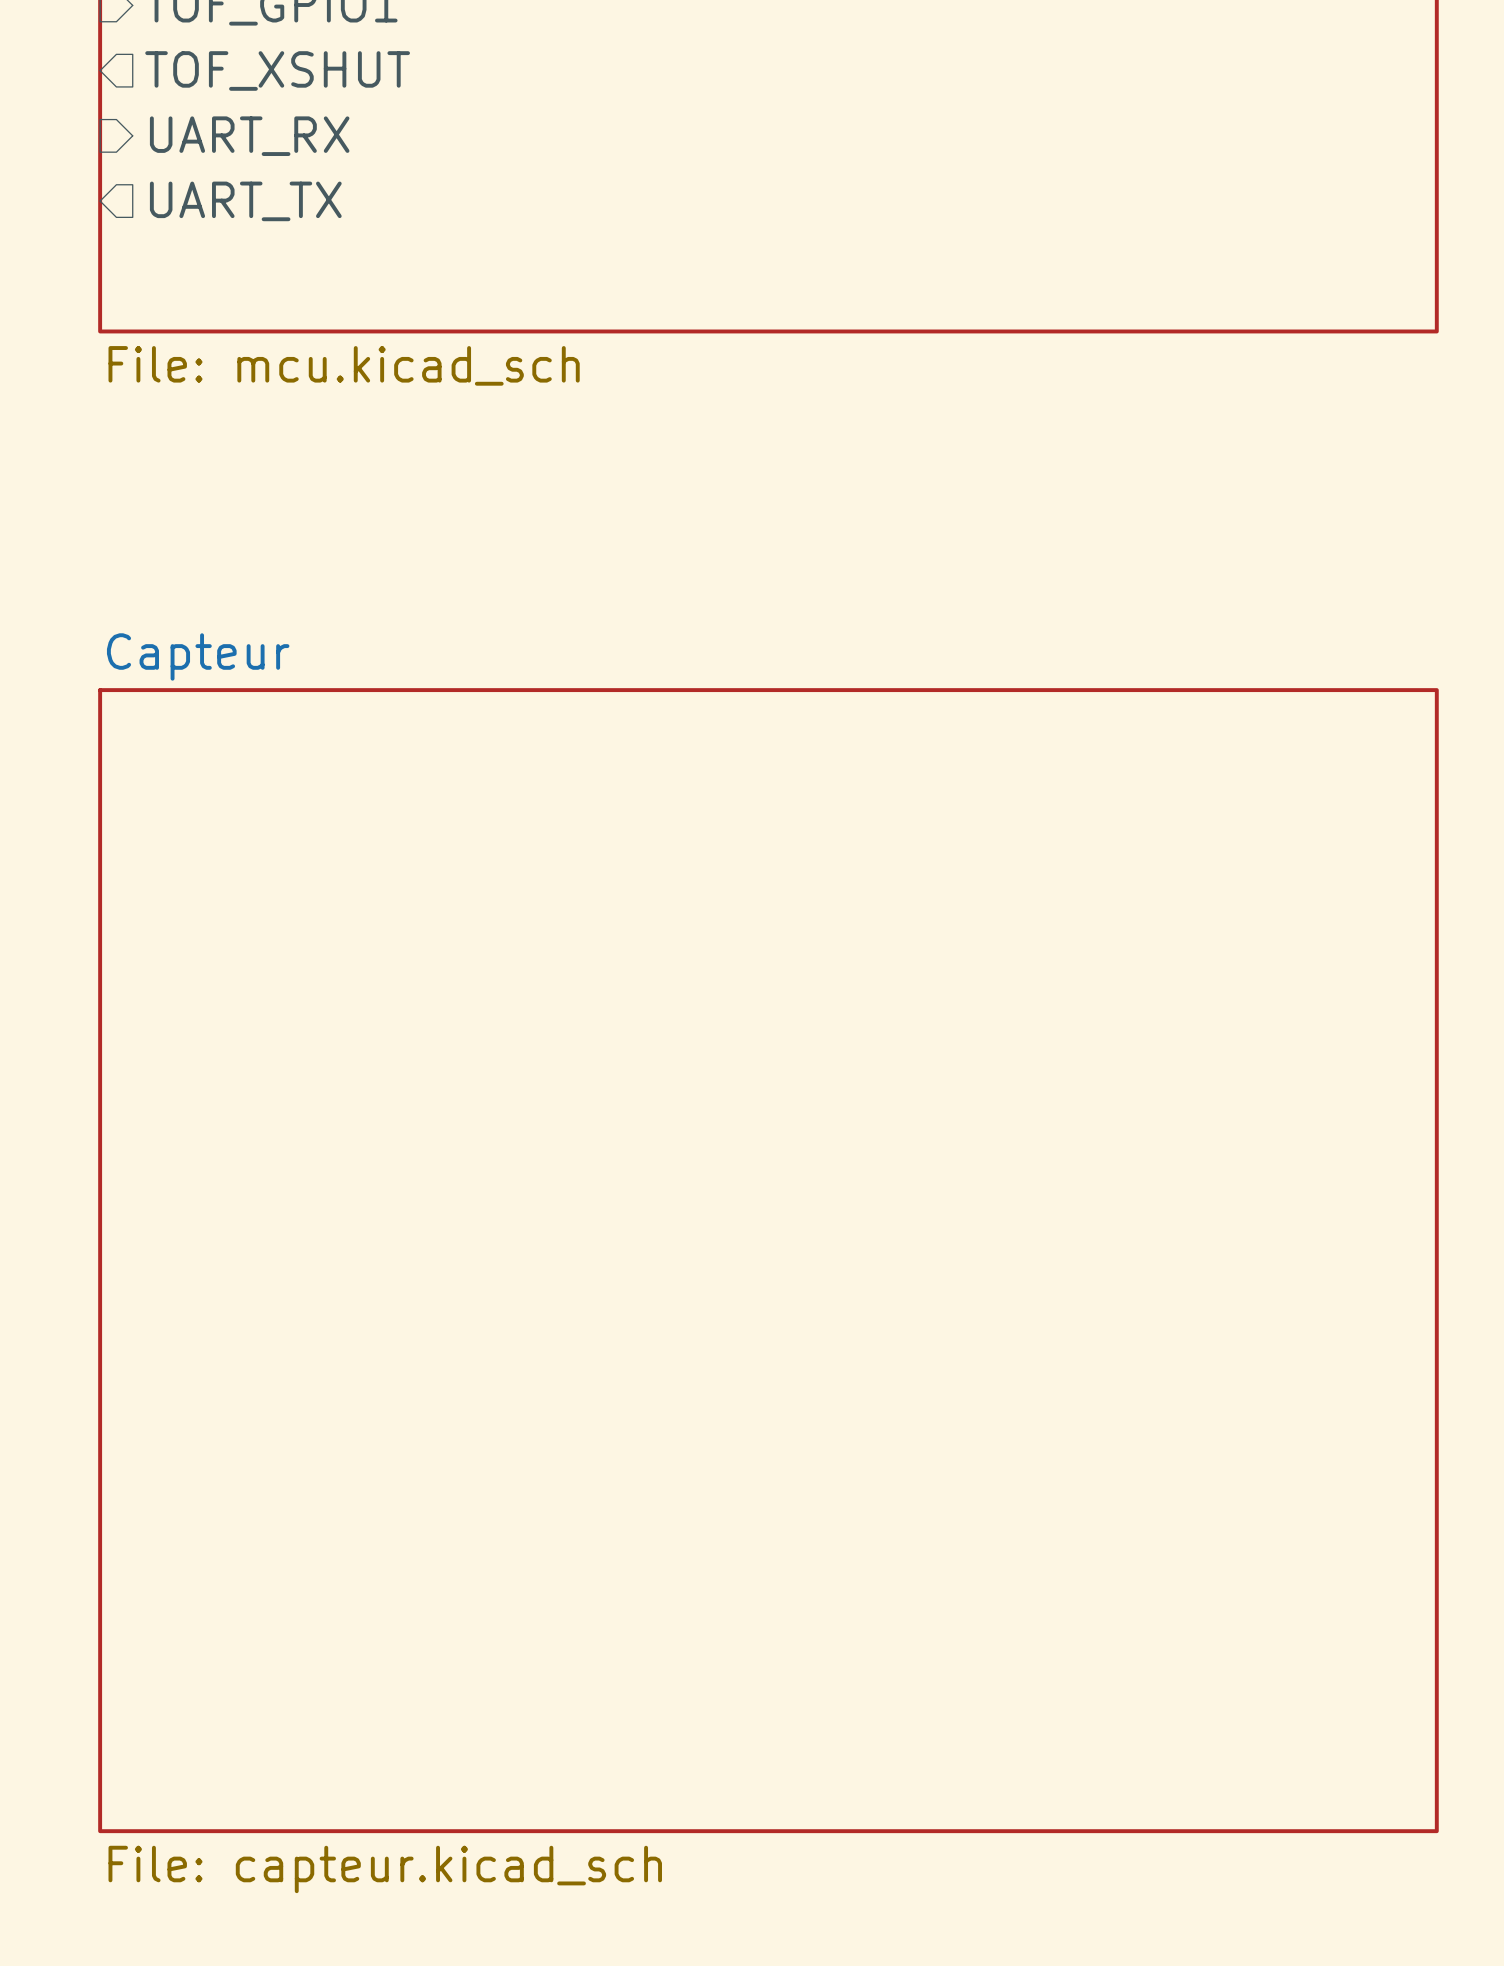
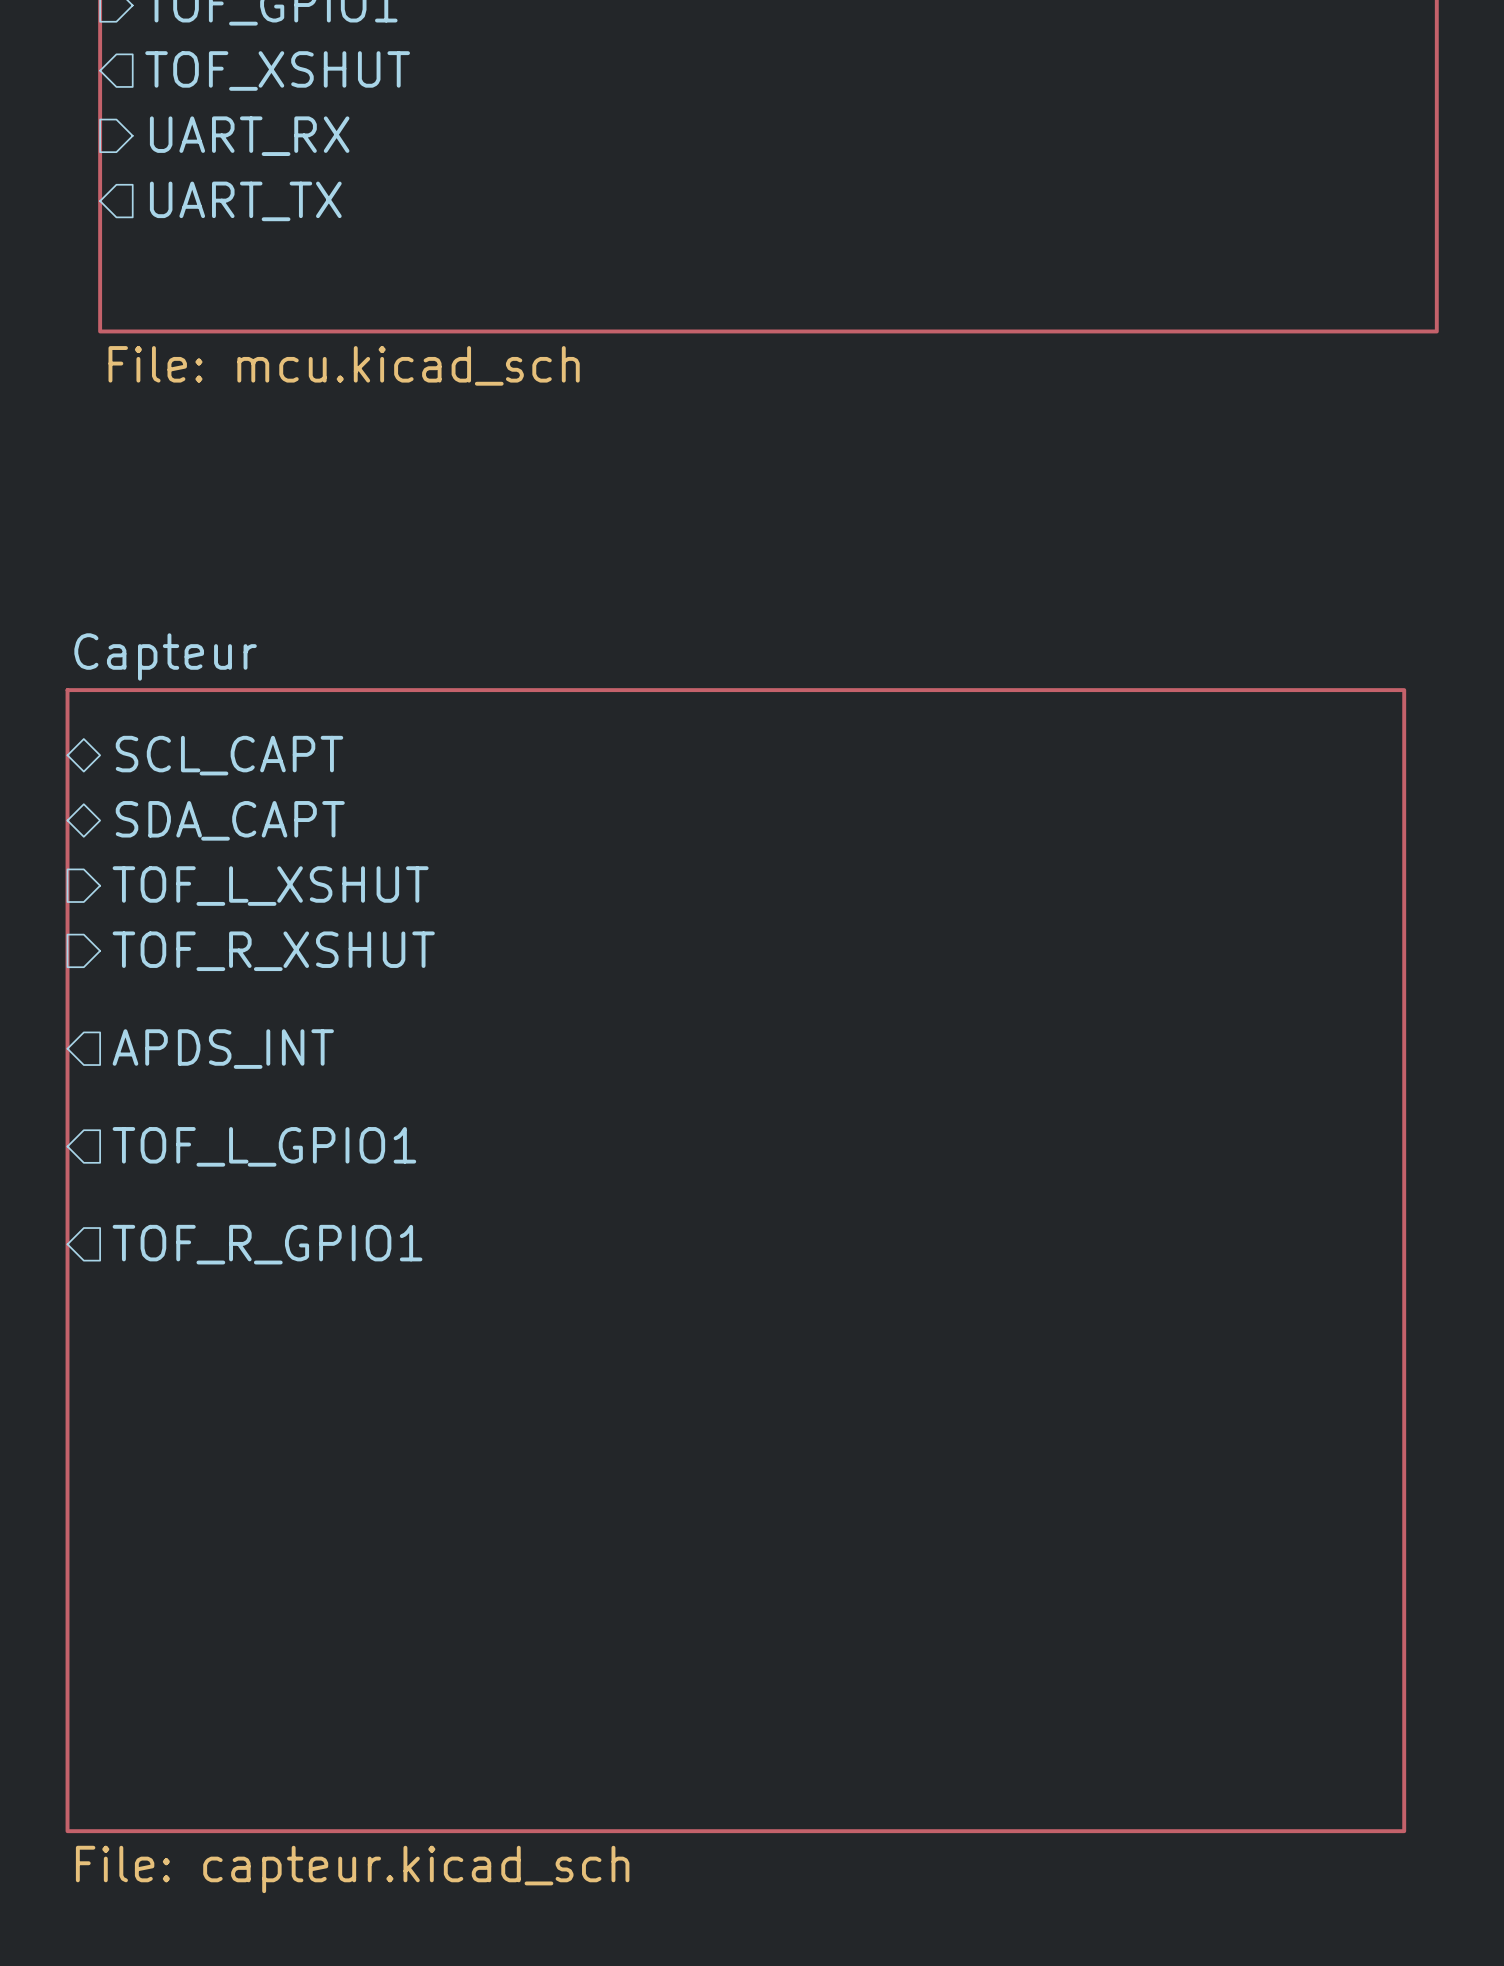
sheet pin: none -> SCL_CAPT (229, 755)
sheet pin: none -> SDA_CAPT (230, 820)
sheet pin: none -> TOF_L_XSHUT (270, 886)
sheet pin: none -> TOF_R_XSHUT (273, 951)
sheet pin: none -> APDS_INT (223, 1049)
sheet pin: none -> TOF_L_GPIO1 (264, 1146)
sheet pin: none -> TOF_R_GPIO1 (267, 1244)
sheet Capteur position: (768, 1260) -> (735, 1260)

